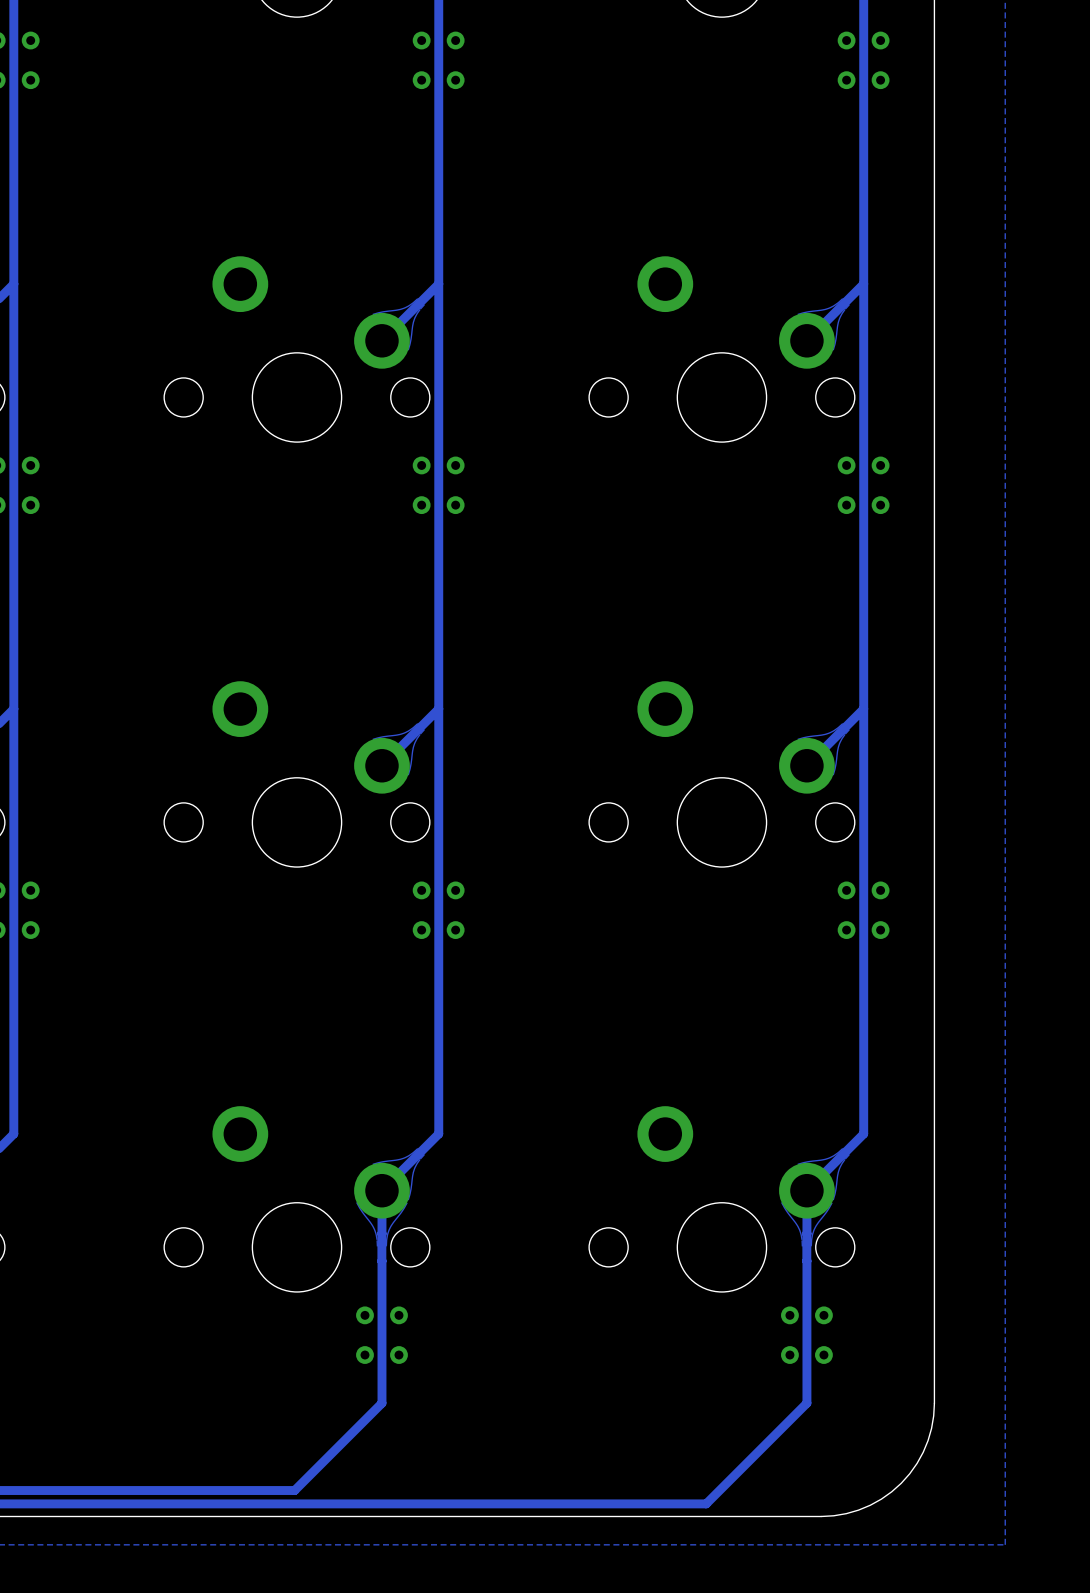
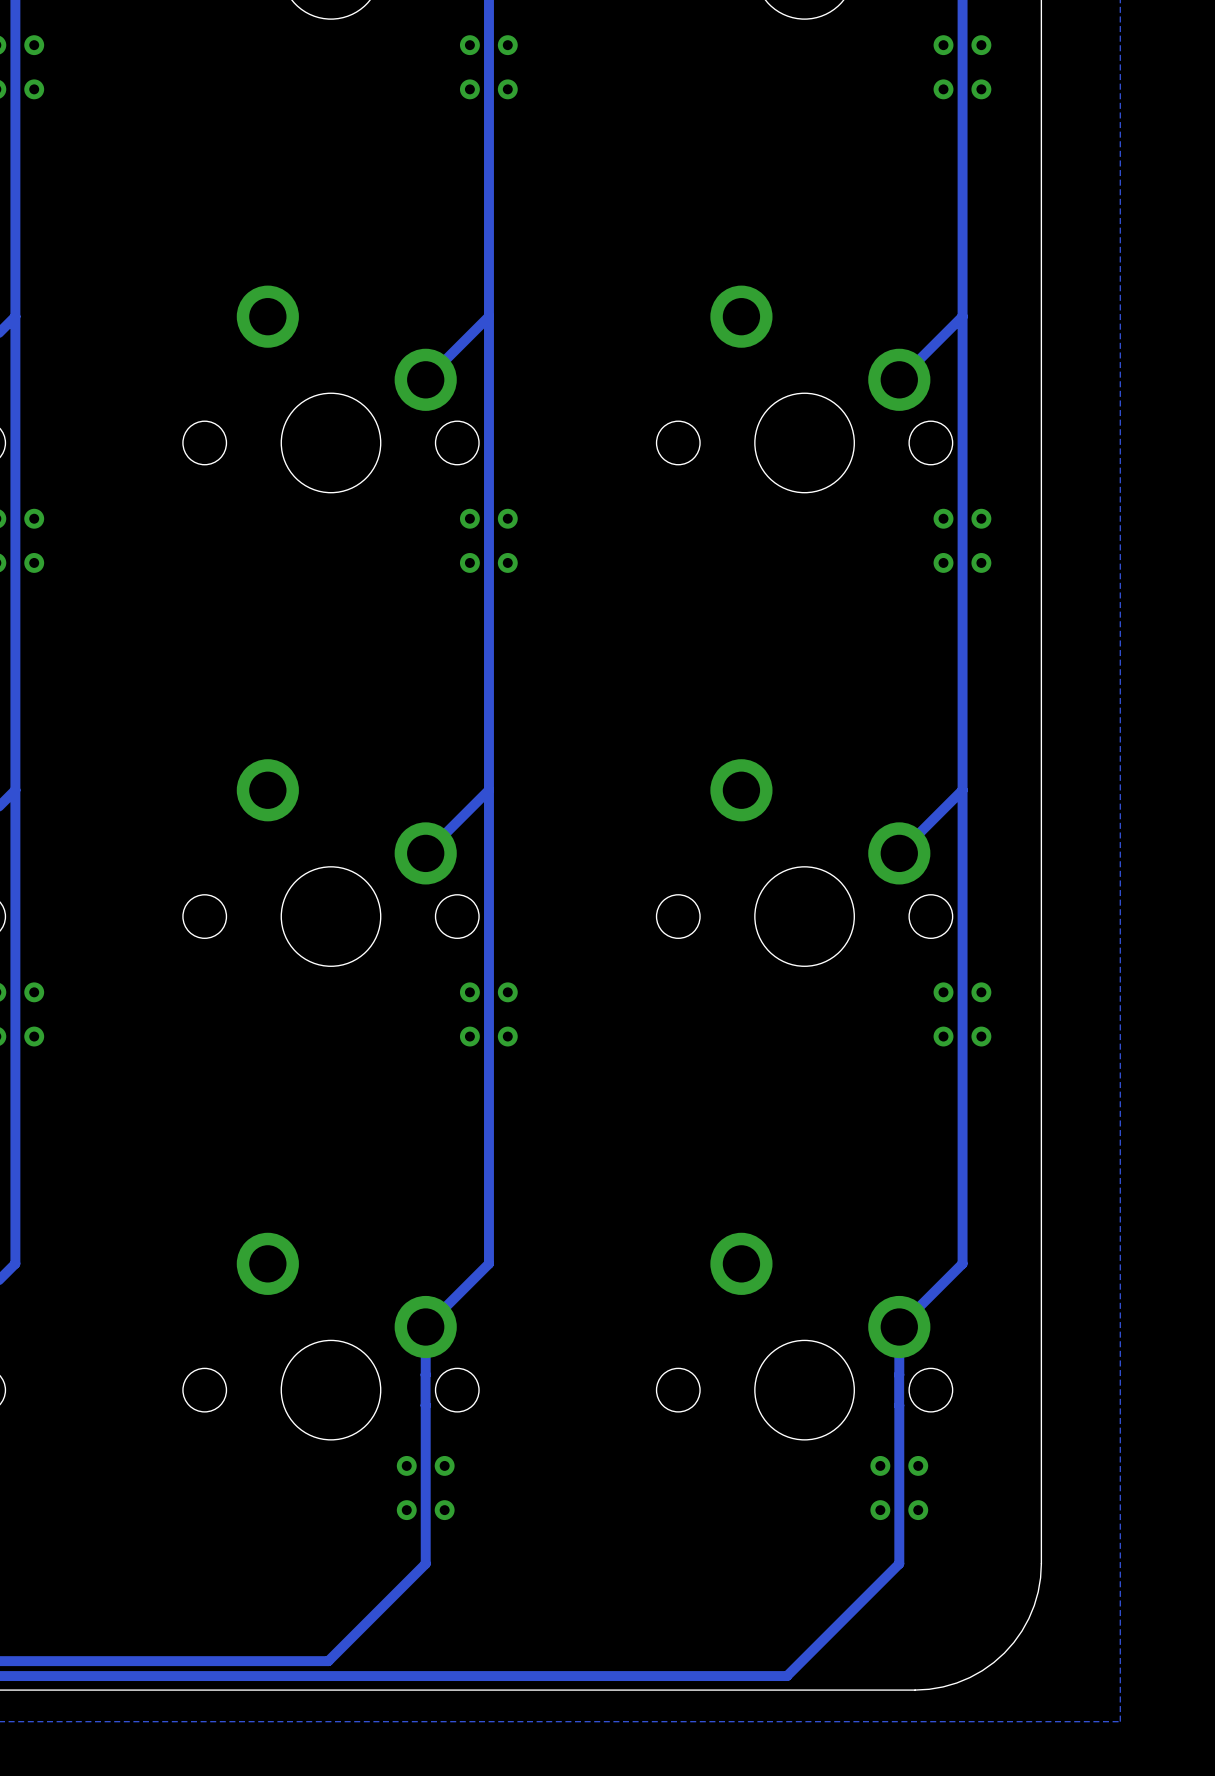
zone outline: (418, 298) (424, 304) (414, 318) (408, 349) (372, 350) (372, 314) (404, 308) (418, 298) -> none
zone outline: (843, 298) (829, 308) (797, 314) (797, 350) (833, 349) (839, 318) (849, 304) (843, 298) -> none
zone outline: (418, 723) (424, 729) (414, 743) (408, 774) (372, 775) (372, 739) (404, 732) (418, 723) -> none
zone outline: (843, 723) (829, 732) (797, 739) (797, 775) (833, 774) (839, 743) (849, 729) (843, 723) -> none
zone outline: (418, 1148) (404, 1157) (372, 1164) (372, 1200) (408, 1199) (414, 1168) (424, 1154) (418, 1148) -> none
zone outline: (843, 1148) (829, 1157) (797, 1164) (797, 1200) (833, 1199) (839, 1168) (849, 1154) (843, 1148) -> none
zone outline: (381, 1176) (356, 1202) (374, 1230) (377, 1246) (386, 1246) (389, 1229) (407, 1202) (381, 1176) -> none
zone outline: (806, 1176) (781, 1202) (799, 1230) (802, 1246) (811, 1246) (814, 1229) (832, 1202) (806, 1176) -> none

